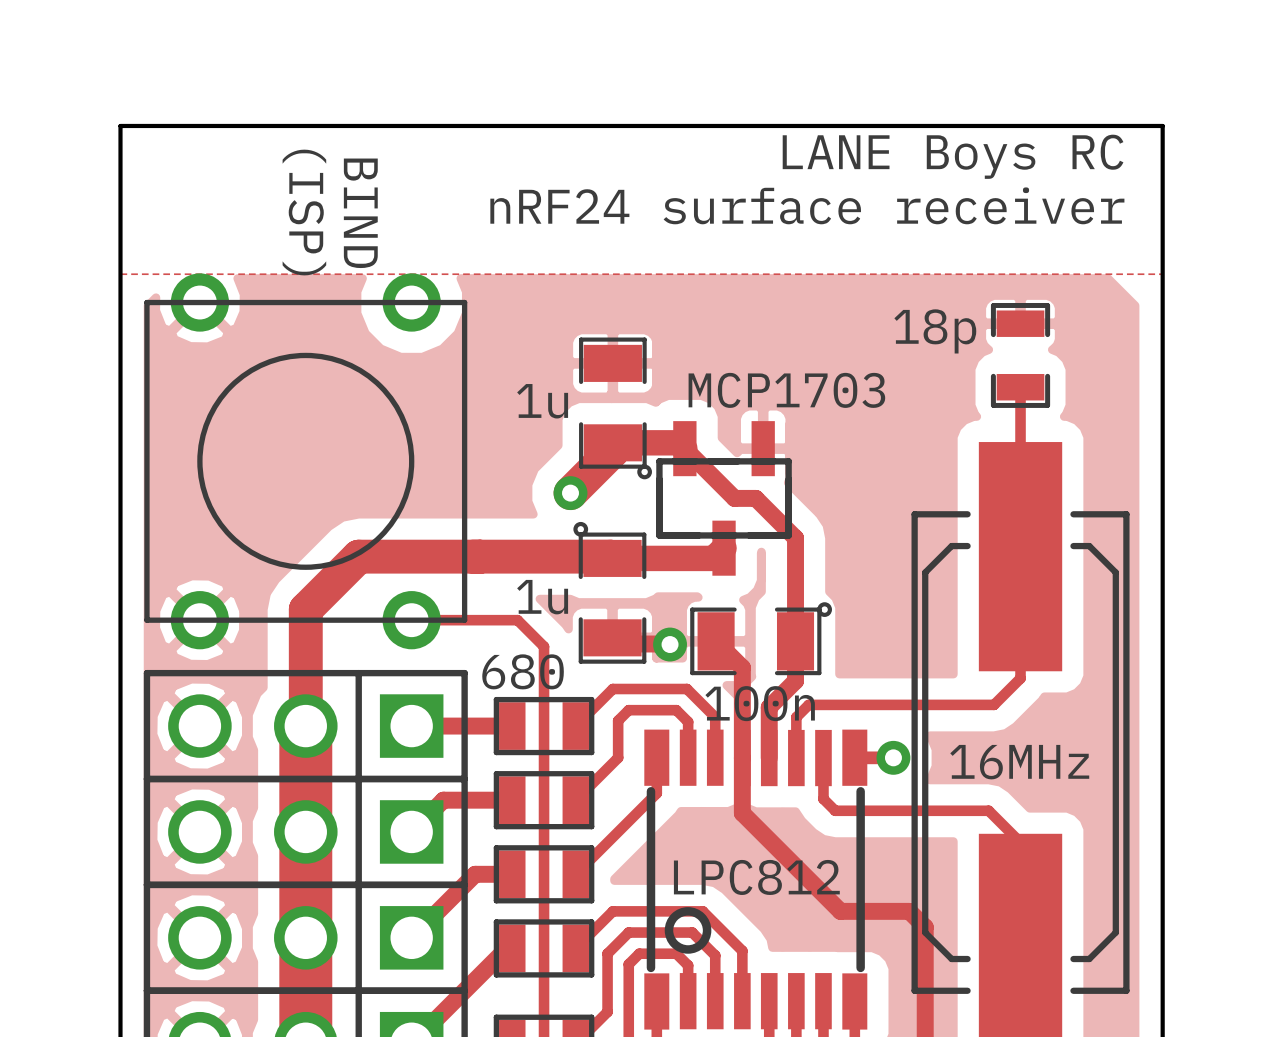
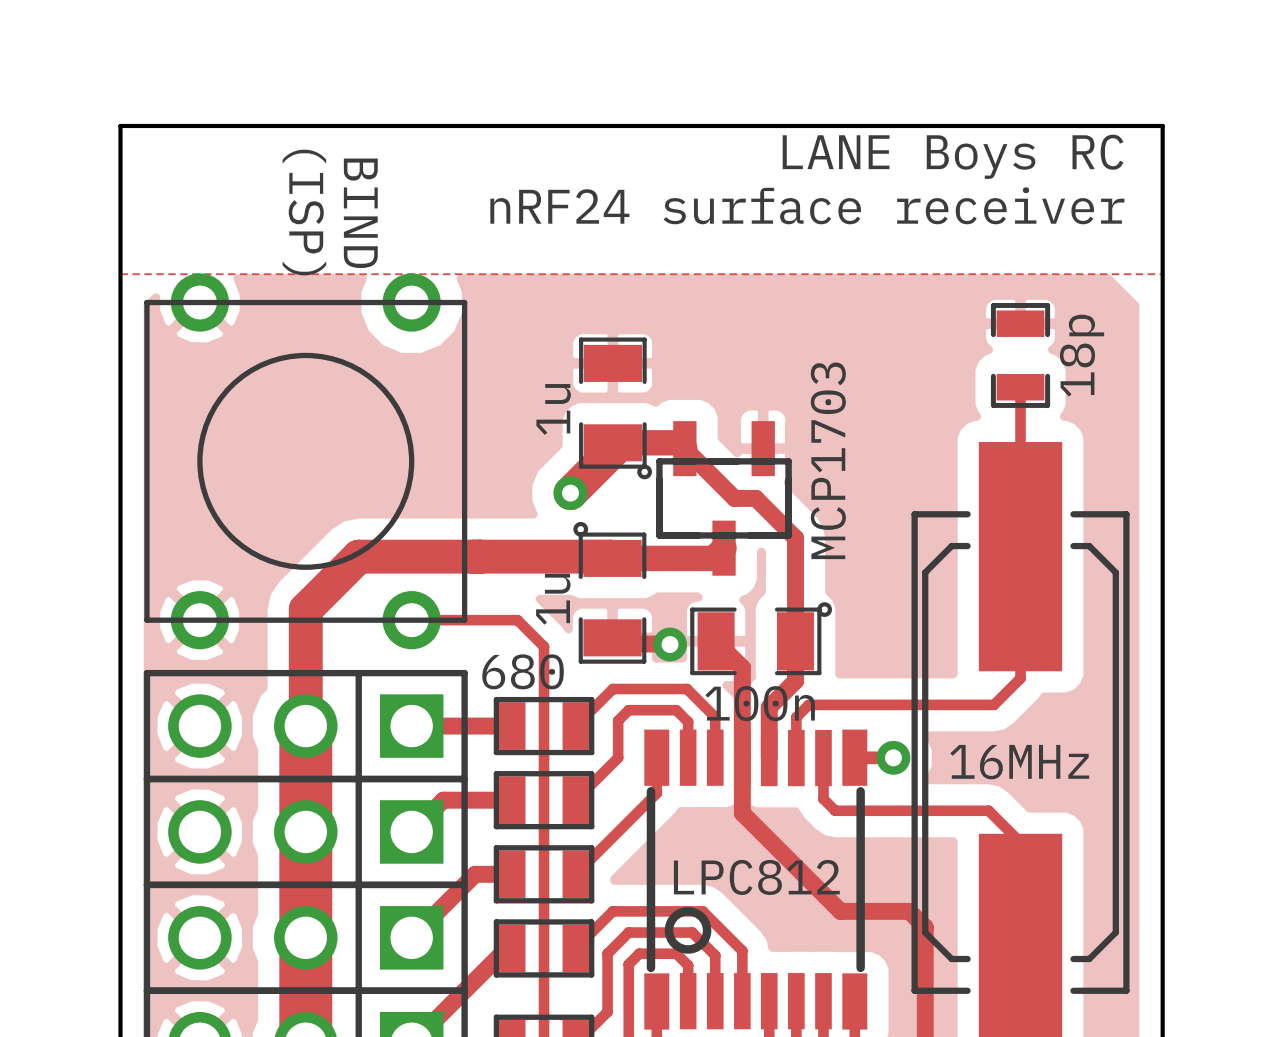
part value rotation: 0° (935, 331) -> 90° counterclockwise (1082, 355)
part value position: 18p (935, 331) -> 18p (1082, 355)
part value rotation: 0° (786, 390) -> 90° counterclockwise (828, 460)
part value rotation: 0° (542, 401) -> 90° counterclockwise (553, 409)
part value rotation: 0° (542, 597) -> 90° counterclockwise (553, 599)

